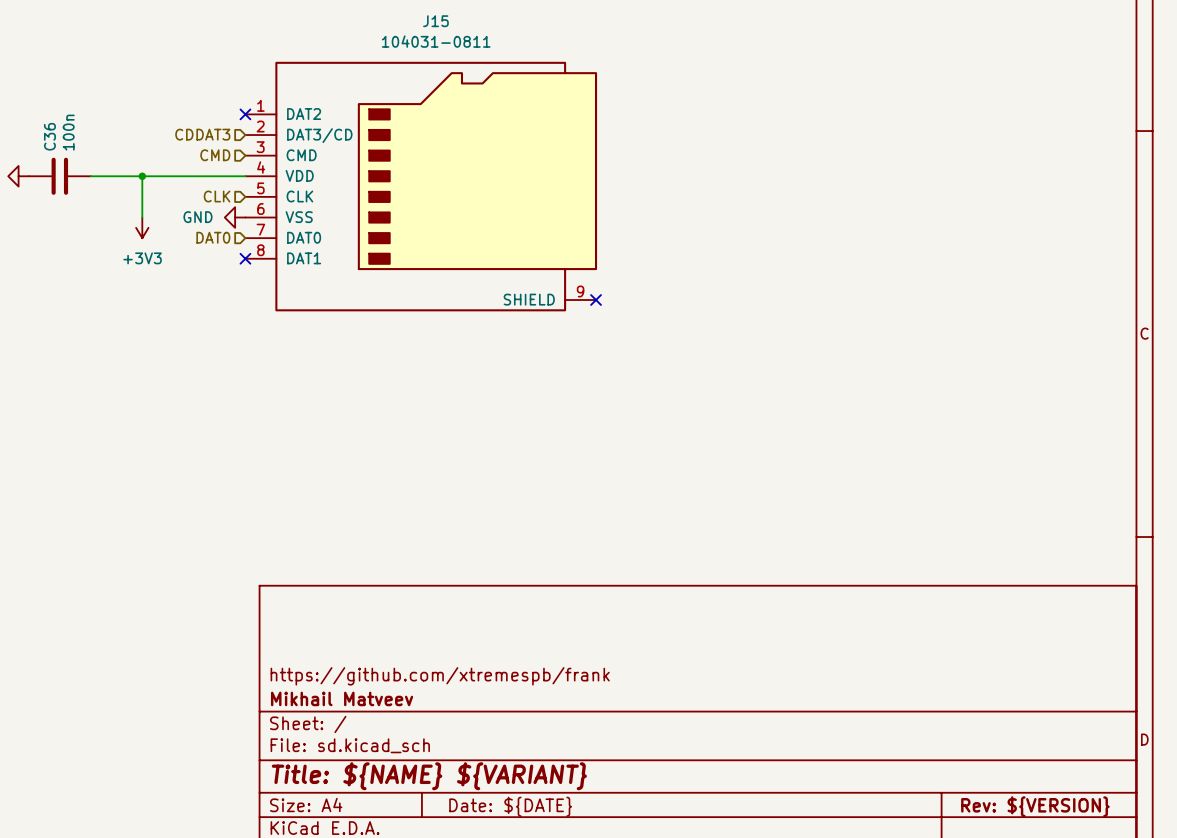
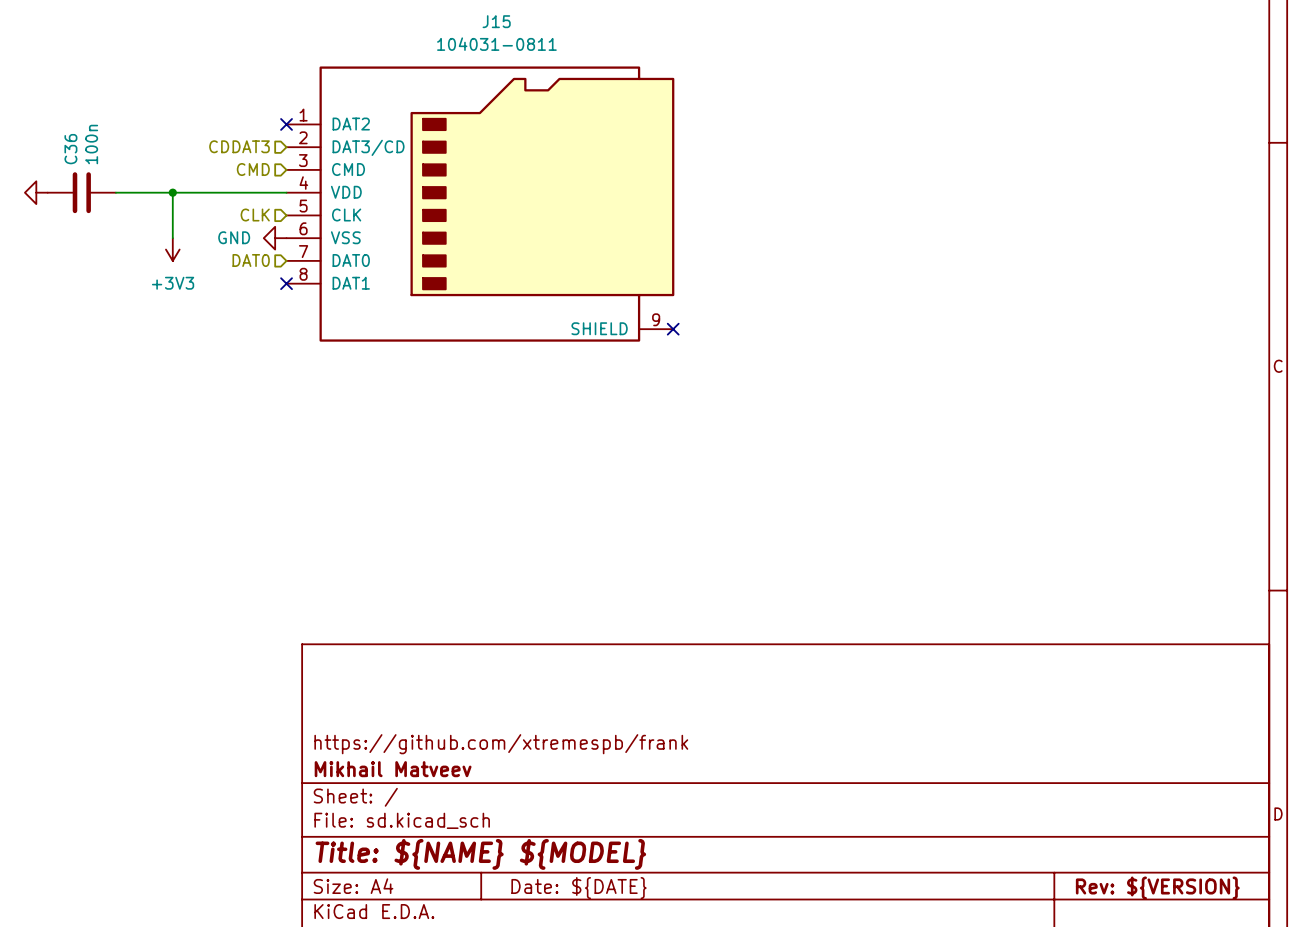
title block: Title: ${NAME} ${VARIANT} (429, 776) -> Title: ${NAME} ${MODEL} (480, 854)

